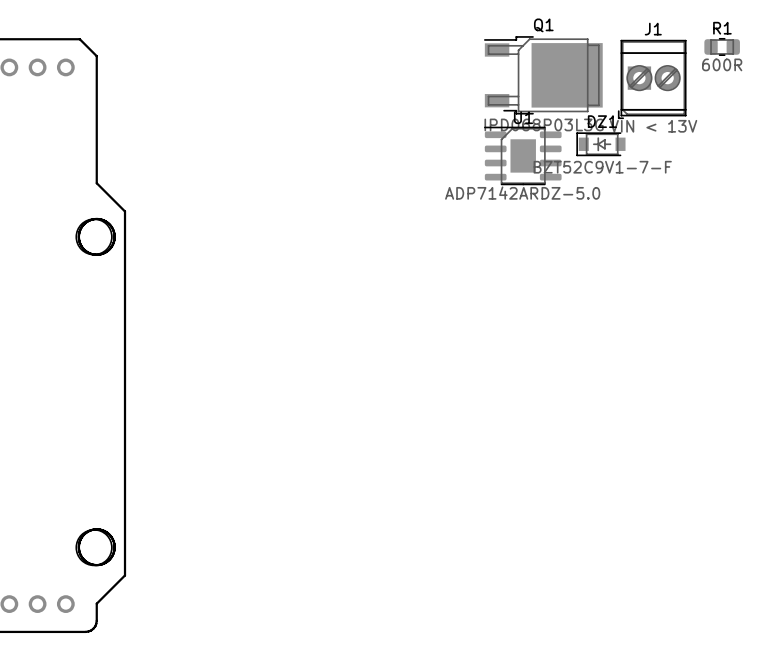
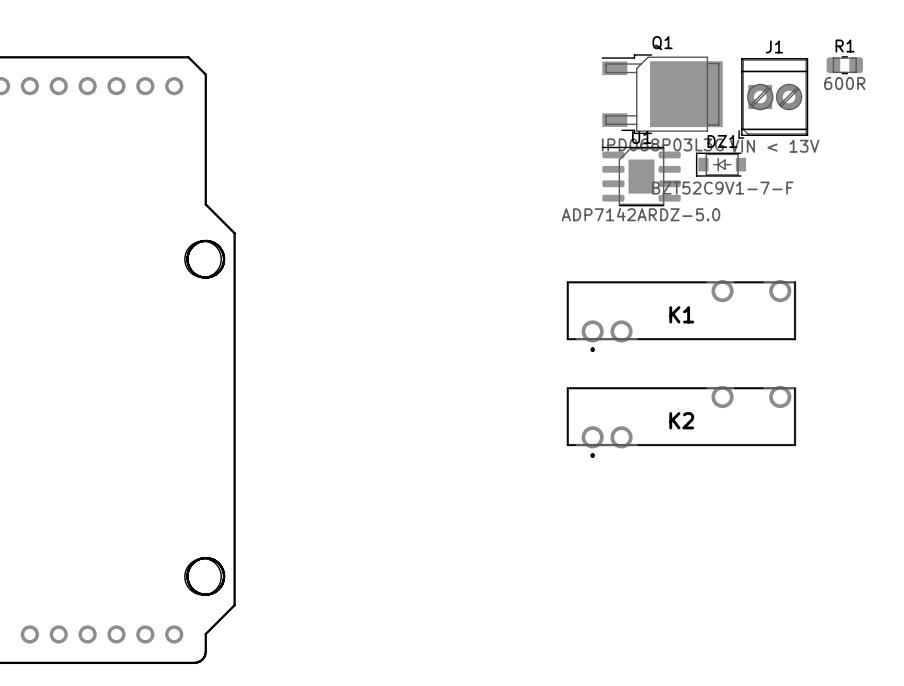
K1: none -> (681, 315)
K2: none -> (681, 421)

